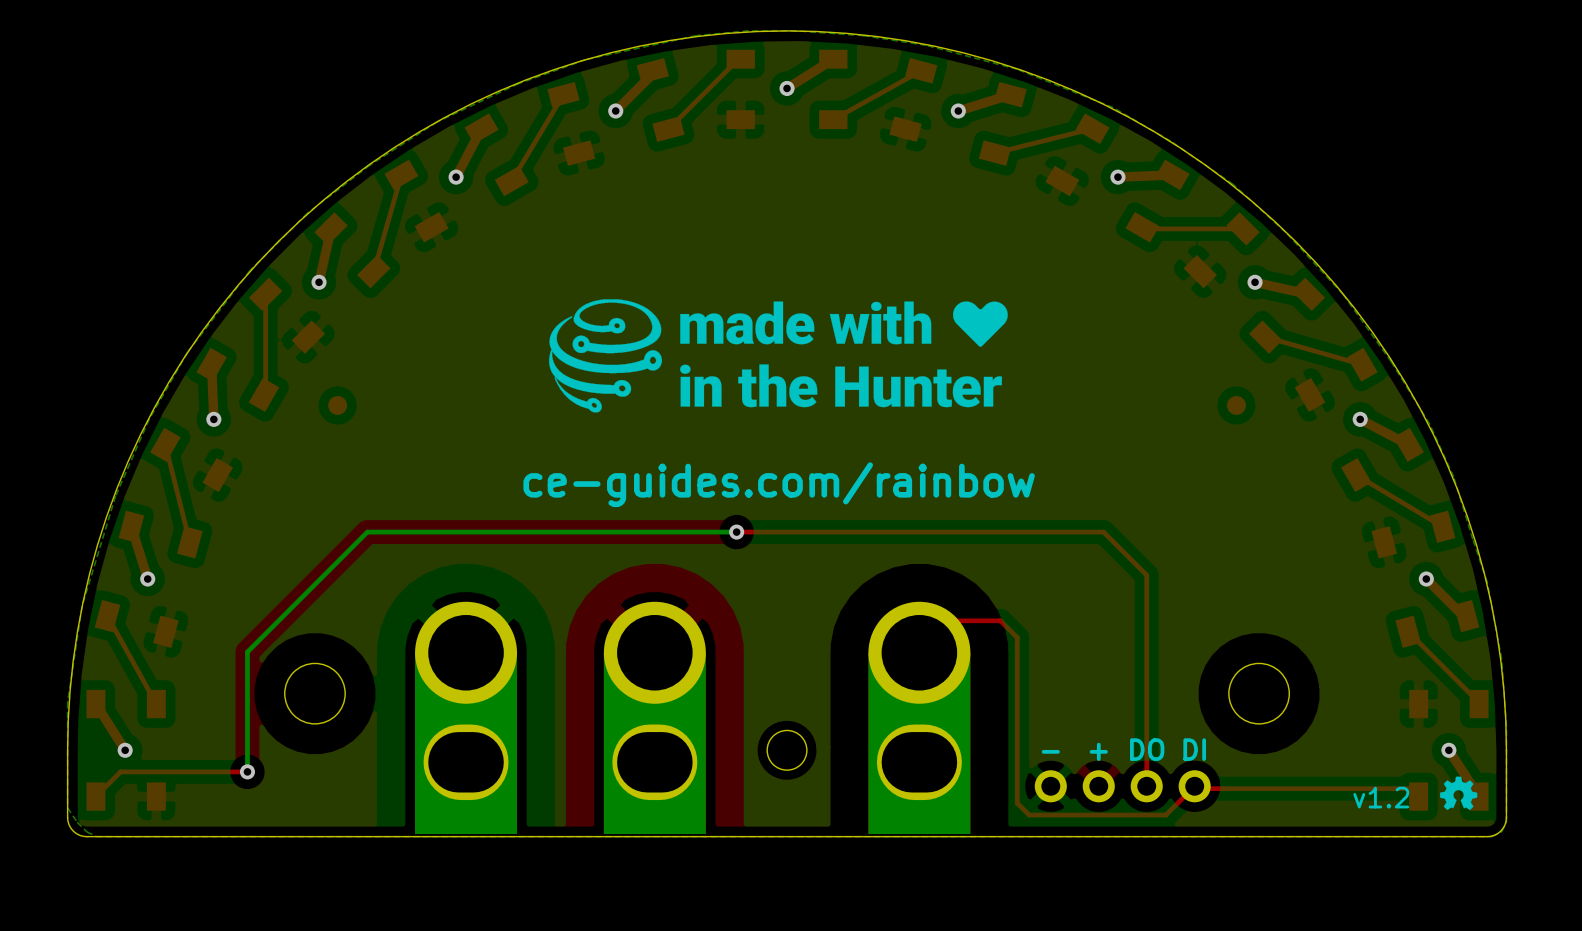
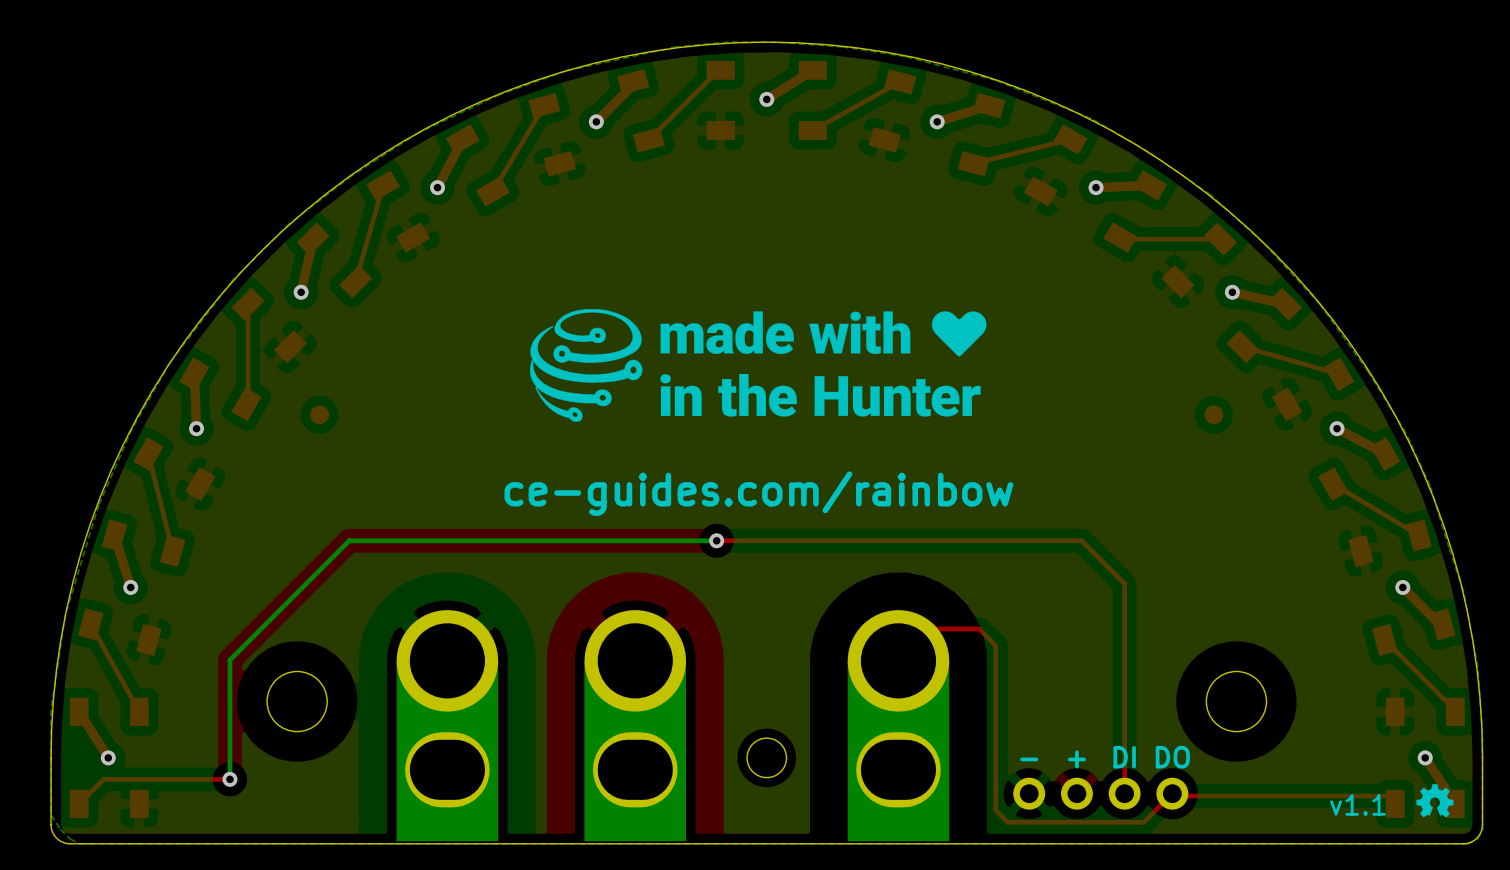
text: DO (1147, 749) -> DI (1124, 757)
text: DI (1194, 749) -> DO (1172, 757)
text: v1.2 (1381, 797) -> v1.1 (1358, 804)

